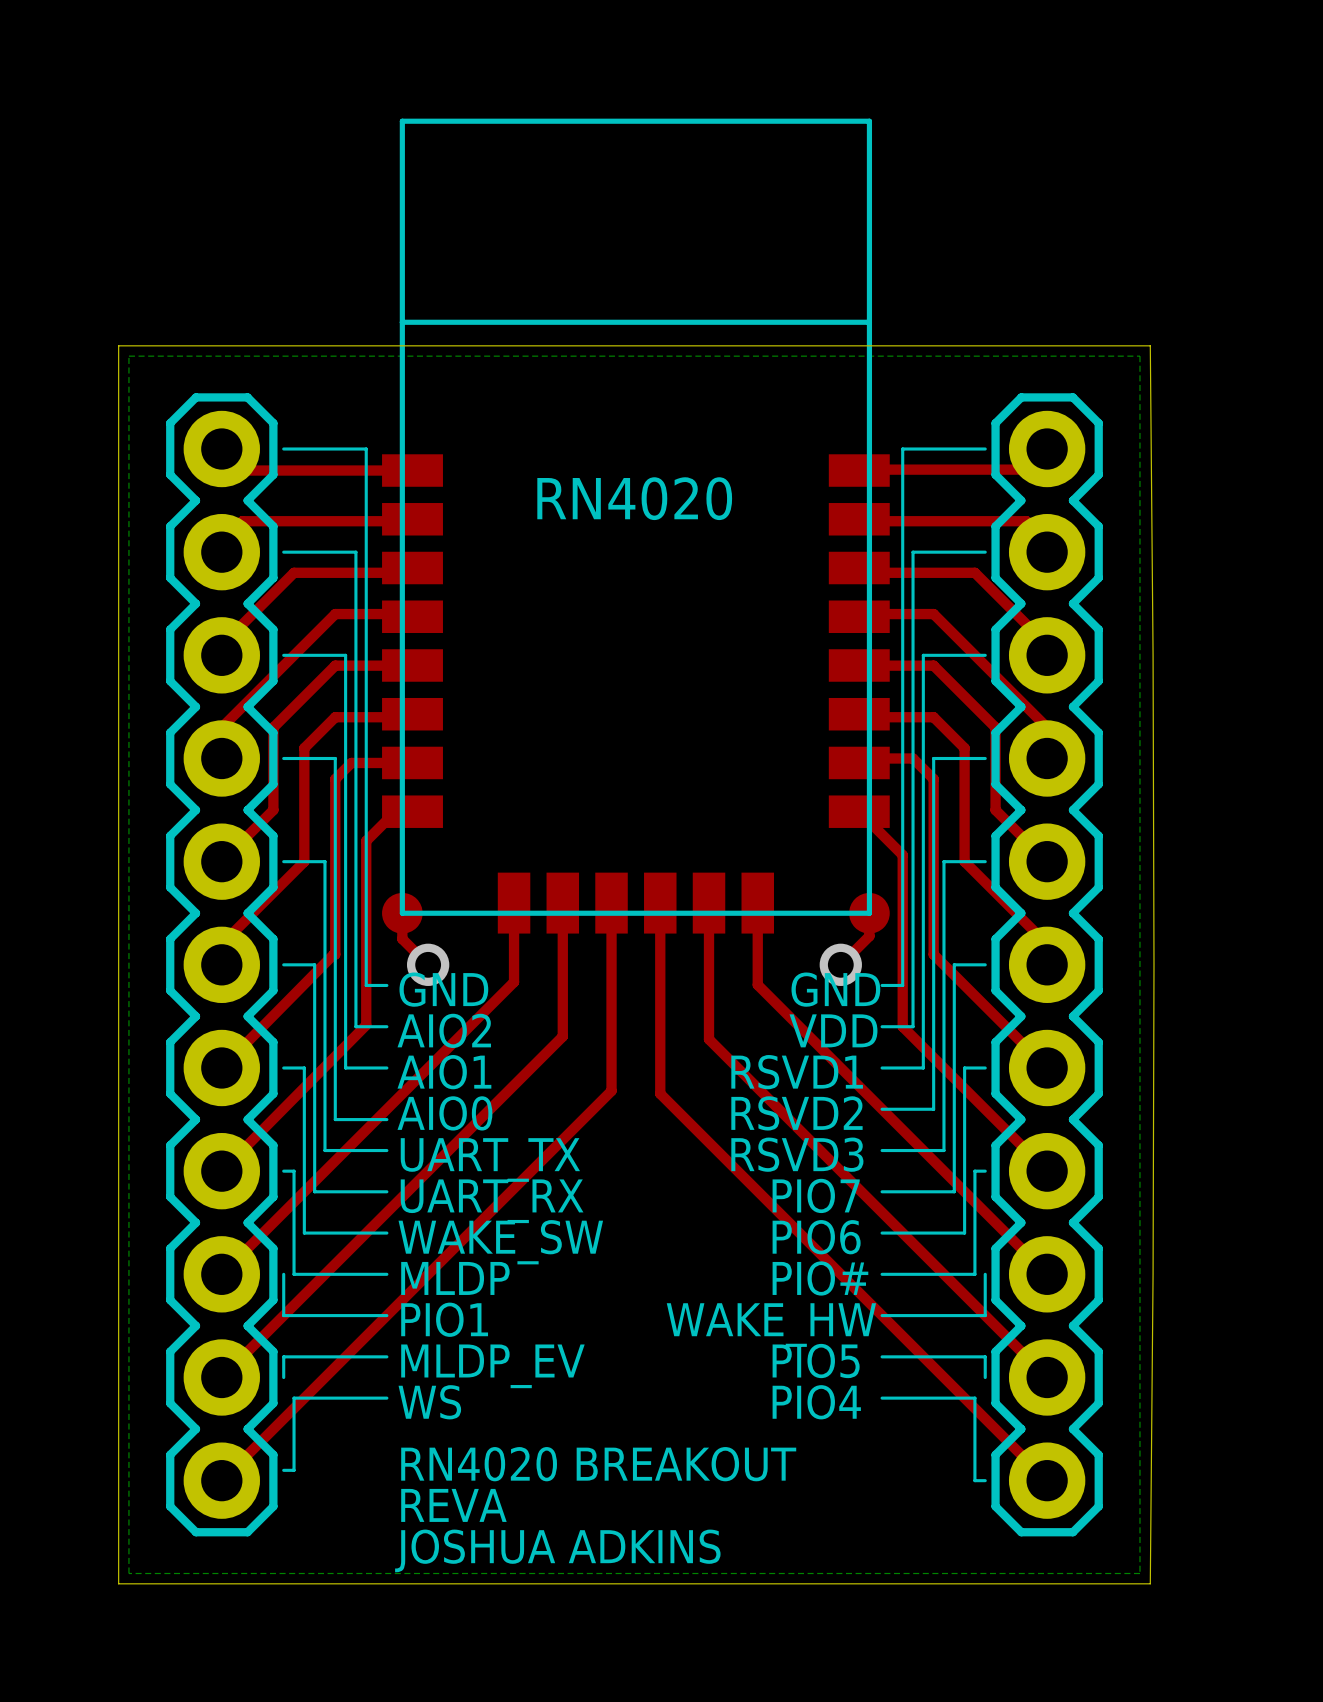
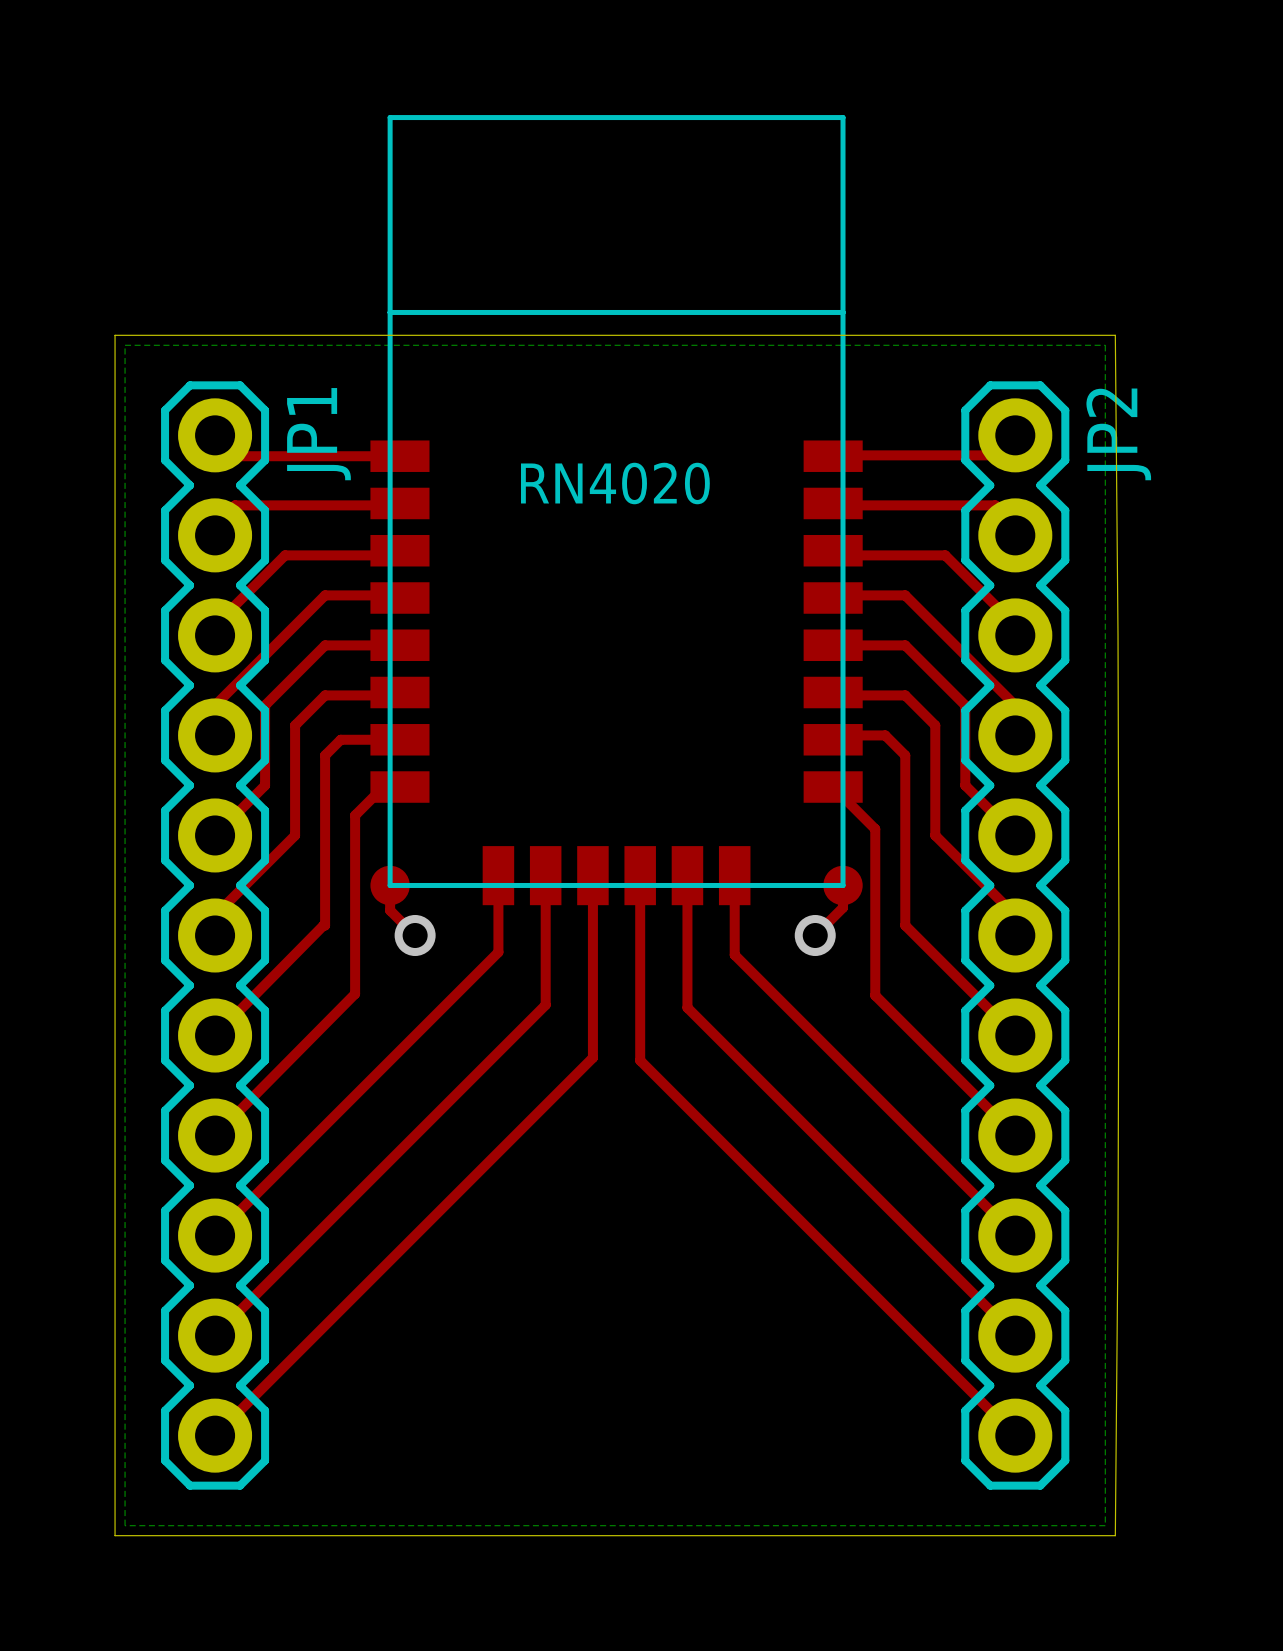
JP1 name: none -> JP1 (318, 434)
JP2 name: none -> JP2 (1118, 434)
line: (283, 449) (366, 449) (366, 985) (386, 985) -> none
line: (985, 449) (902, 449) (902, 985) (882, 985) -> none
line: (283, 552) (355, 552) (355, 1026) (386, 1026) -> none
line: (985, 552) (913, 552) (913, 1026) (882, 1026) -> none
line: (283, 655) (345, 655) (345, 1067) (386, 1067) -> none
line: (985, 655) (923, 655) (923, 1067) (882, 1067) -> none
line: (283, 758) (335, 758) (335, 1119) (386, 1119) -> none
line: (985, 758) (933, 758) (933, 1109) (882, 1109) -> none
line: (283, 861) (324, 861) (324, 1150) (386, 1150) -> none
line: (985, 861) (943, 861) (943, 1150) (882, 1150) -> none
line: (283, 964) (314, 964) (314, 1191) (386, 1191) -> none
line: (985, 964) (954, 964) (954, 1191) (882, 1191) -> none
text: GND (443, 989) -> none
text: GND (835, 989) -> none
text: AIO2 (444, 1030) -> none
text: VDD (833, 1030) -> none
line: (283, 1067) (304, 1067) (304, 1233) (386, 1233) -> none
line: (985, 1067) (964, 1067) (964, 1233) (882, 1233) -> none
text: AIO1 (444, 1072) -> none
text: RSVD1 (797, 1072) -> none
text: AIO0 (444, 1113) -> none
text: RSVD2 (796, 1113) -> none
text: RSVD3 (797, 1154) -> none
text: UART_TX (490, 1159) -> none
line: (283, 1171) (294, 1171) (294, 1274) (386, 1274) -> none
line: (985, 1171) (974, 1171) (974, 1274) (882, 1274) -> none
text: PIO7 (816, 1195) -> none
text: UART_RX (492, 1201) -> none
text: PIO6 (816, 1237) -> none
text: WAKE_SW (500, 1242) -> none
line: (283, 1274) (283, 1315) (386, 1315) -> none
line: (985, 1274) (985, 1315) (882, 1315) -> none
text: MLDP (455, 1278) -> none
text: PIO# (820, 1278) -> none
text: PIO1 (444, 1319) -> none
text: WAKE_HW (771, 1325) -> none
line: (386, 1356) (283, 1356) (283, 1377) -> none
line: (882, 1356) (985, 1356) (985, 1377) -> none
text: PIO5 (816, 1361) -> none
text: MLDP_EV (492, 1366) -> none
line: (386, 1398) (294, 1398) (294, 1470) (283, 1470) -> none
line: (882, 1398) (974, 1398) (974, 1480) (985, 1480) -> none
text: WS (429, 1402) -> none
text: PIO4 (816, 1402) -> none
text: RN4020 BREAKOUT (598, 1464) -> none
text: REVA (453, 1505) -> none
text: JOSHUA ADKINS (557, 1550) -> none

